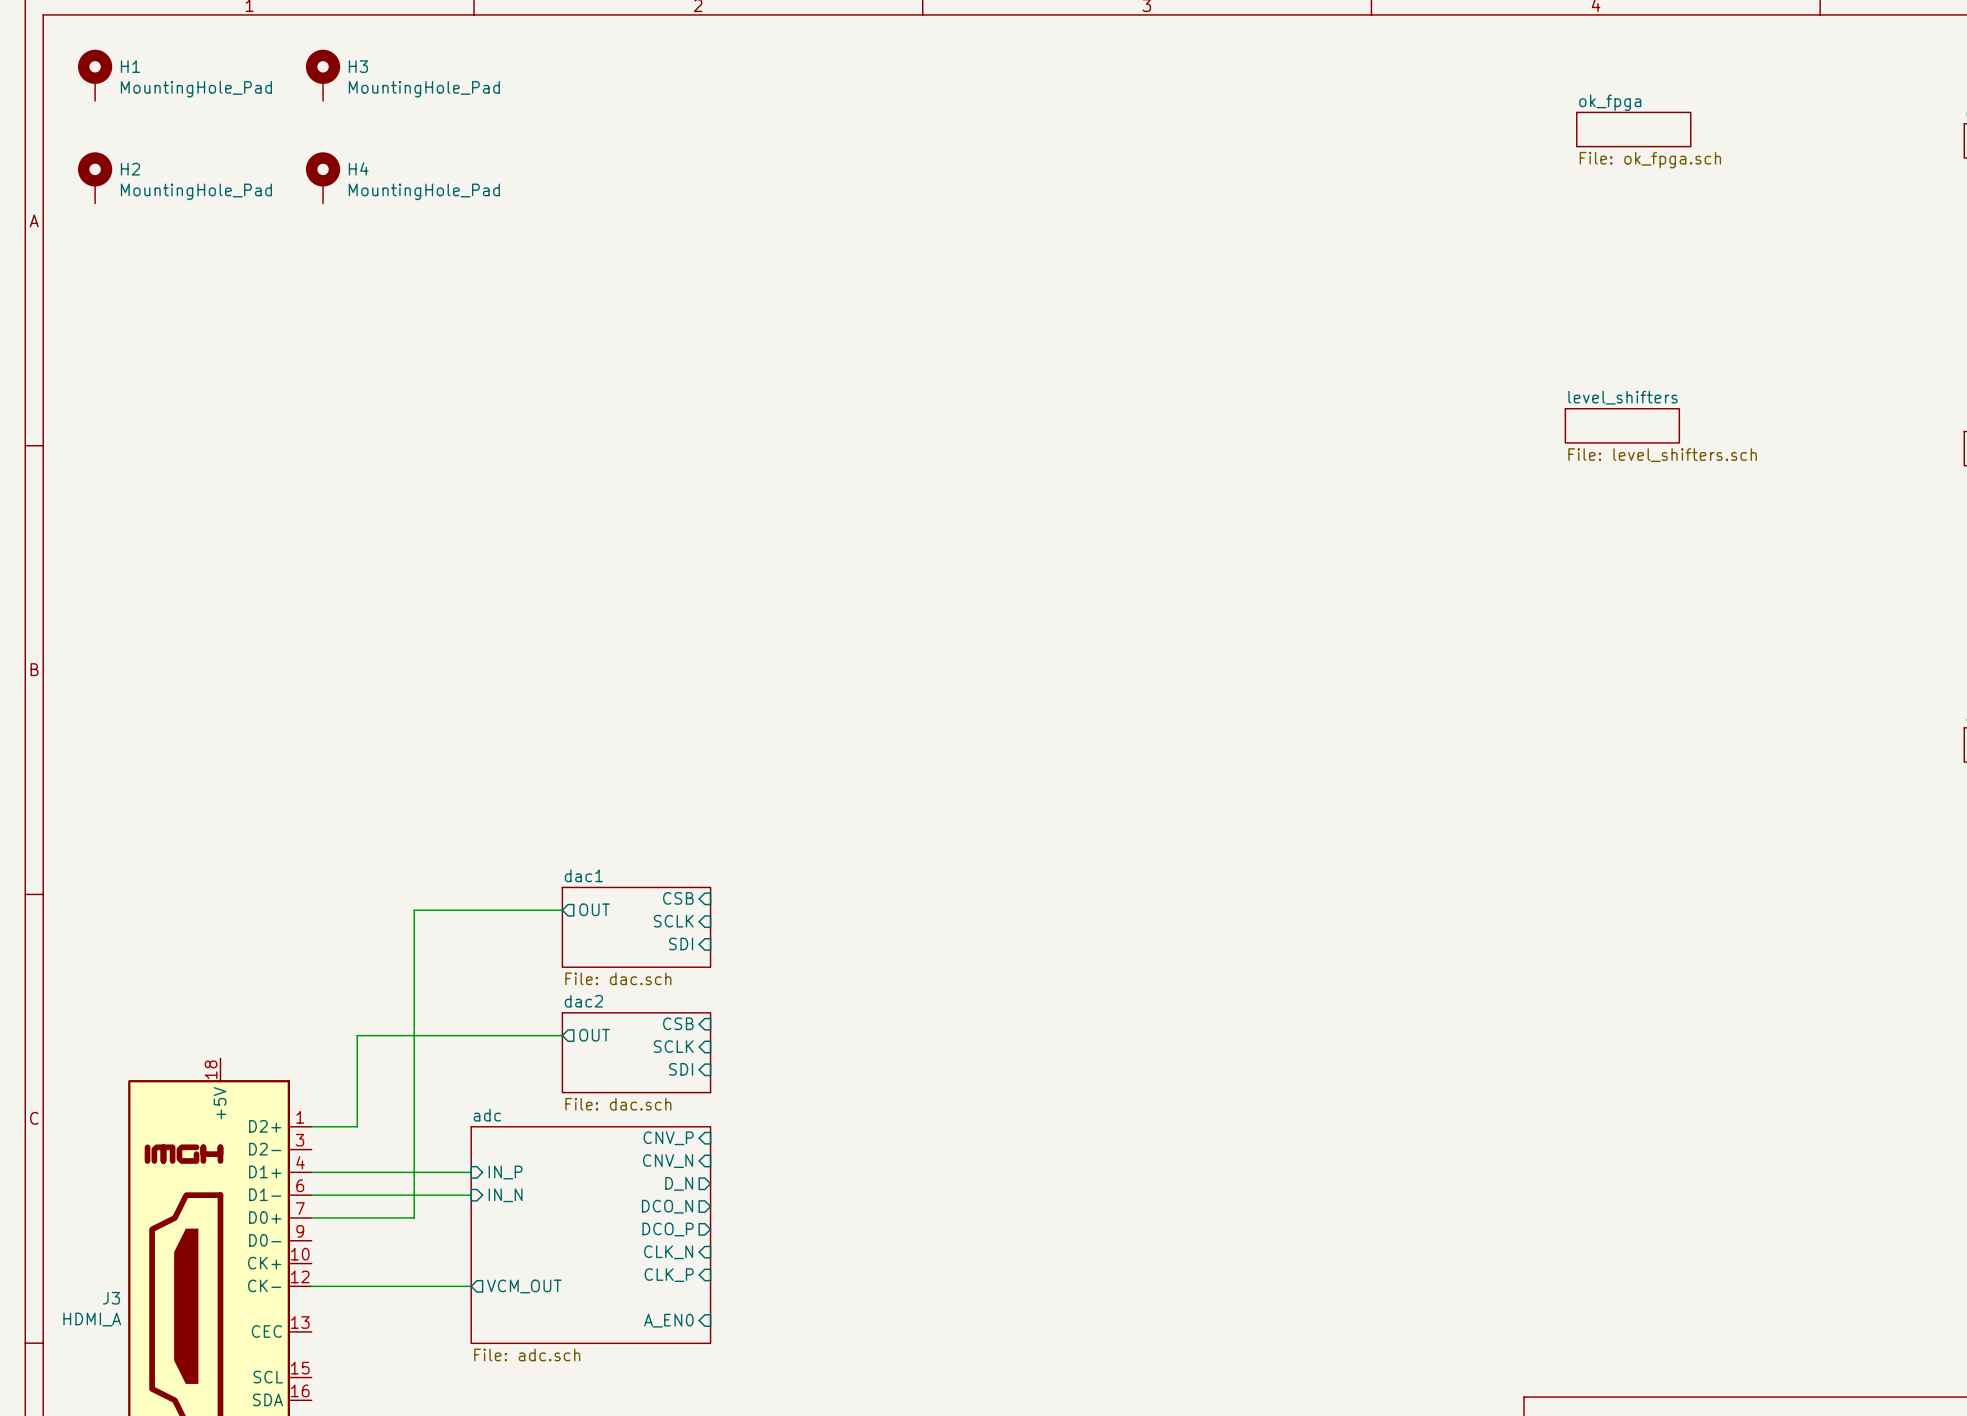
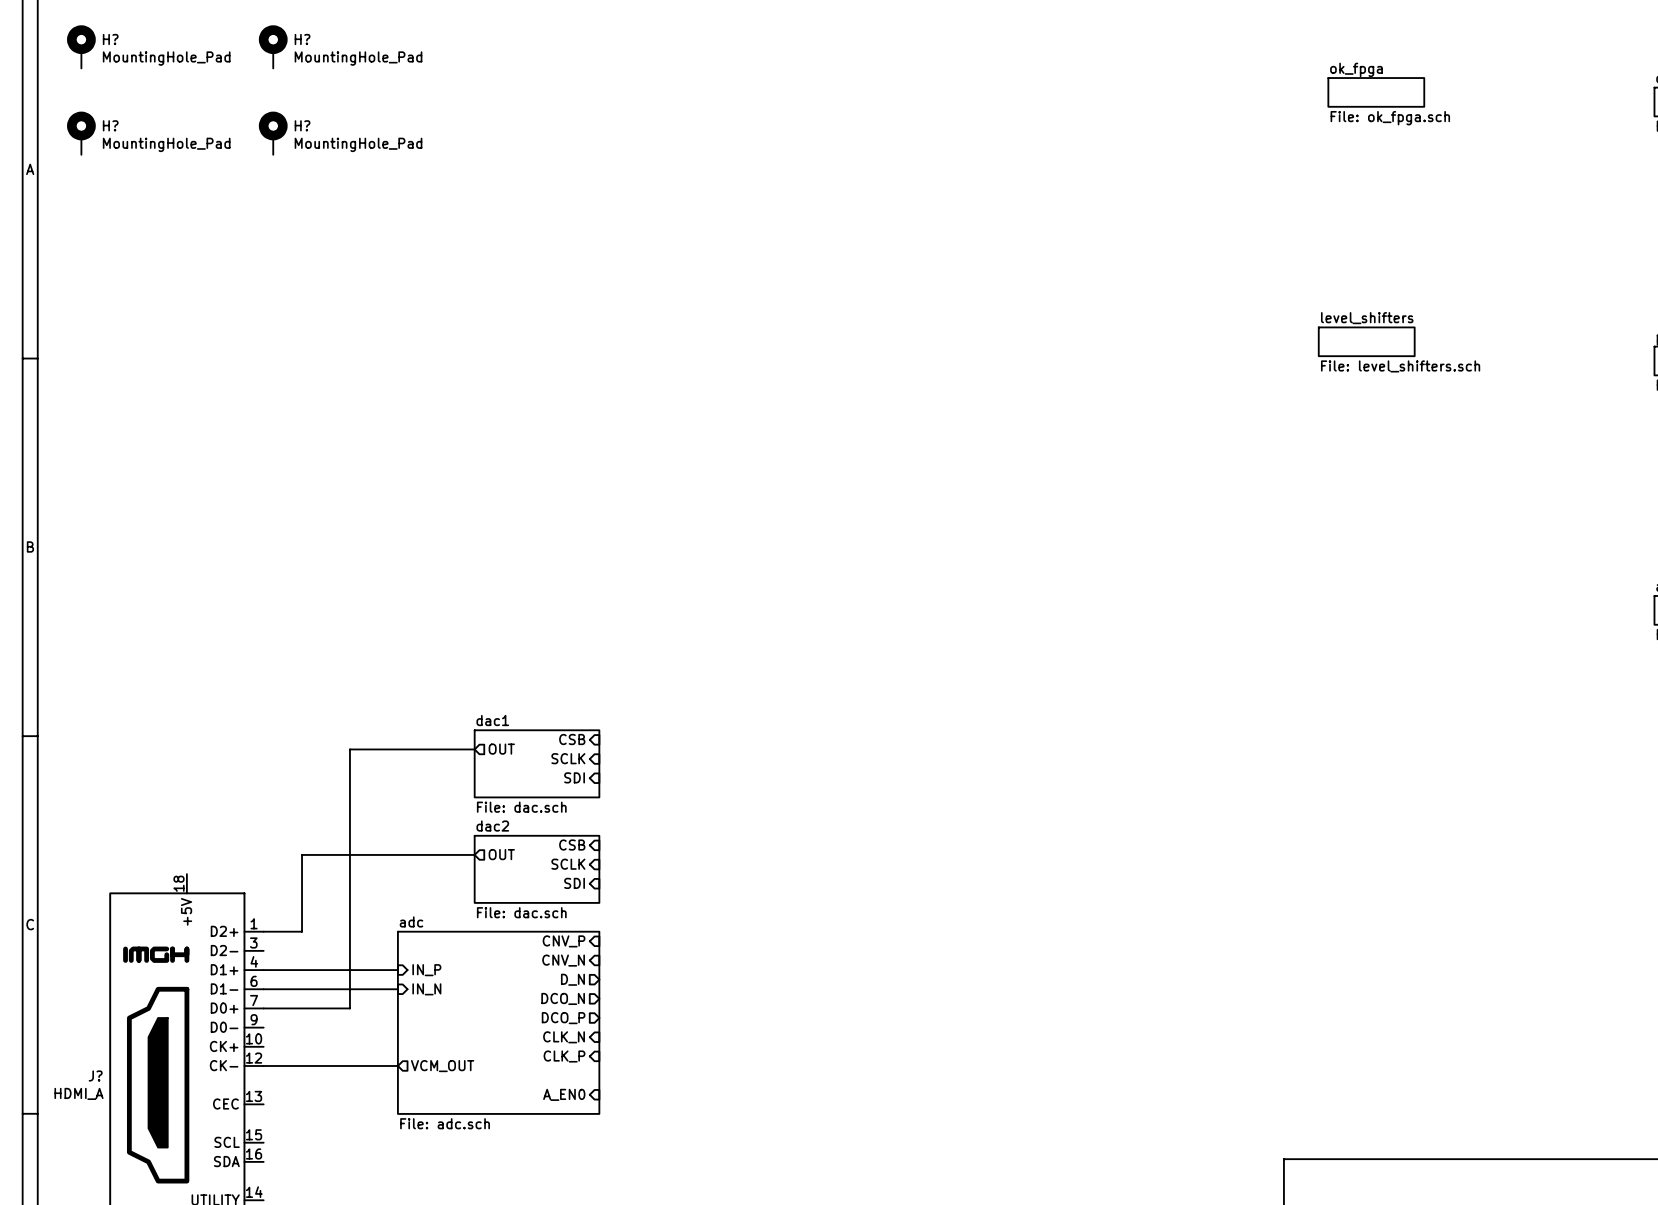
H1 name: H1 (130, 66) -> H? (110, 39)
H3 name: H3 (358, 66) -> H? (302, 39)
H4 name: H4 (358, 168) -> H? (302, 125)
H2 name: H2 (130, 169) -> H? (110, 125)
J3 name: J3 (111, 1298) -> J? (95, 1075)

